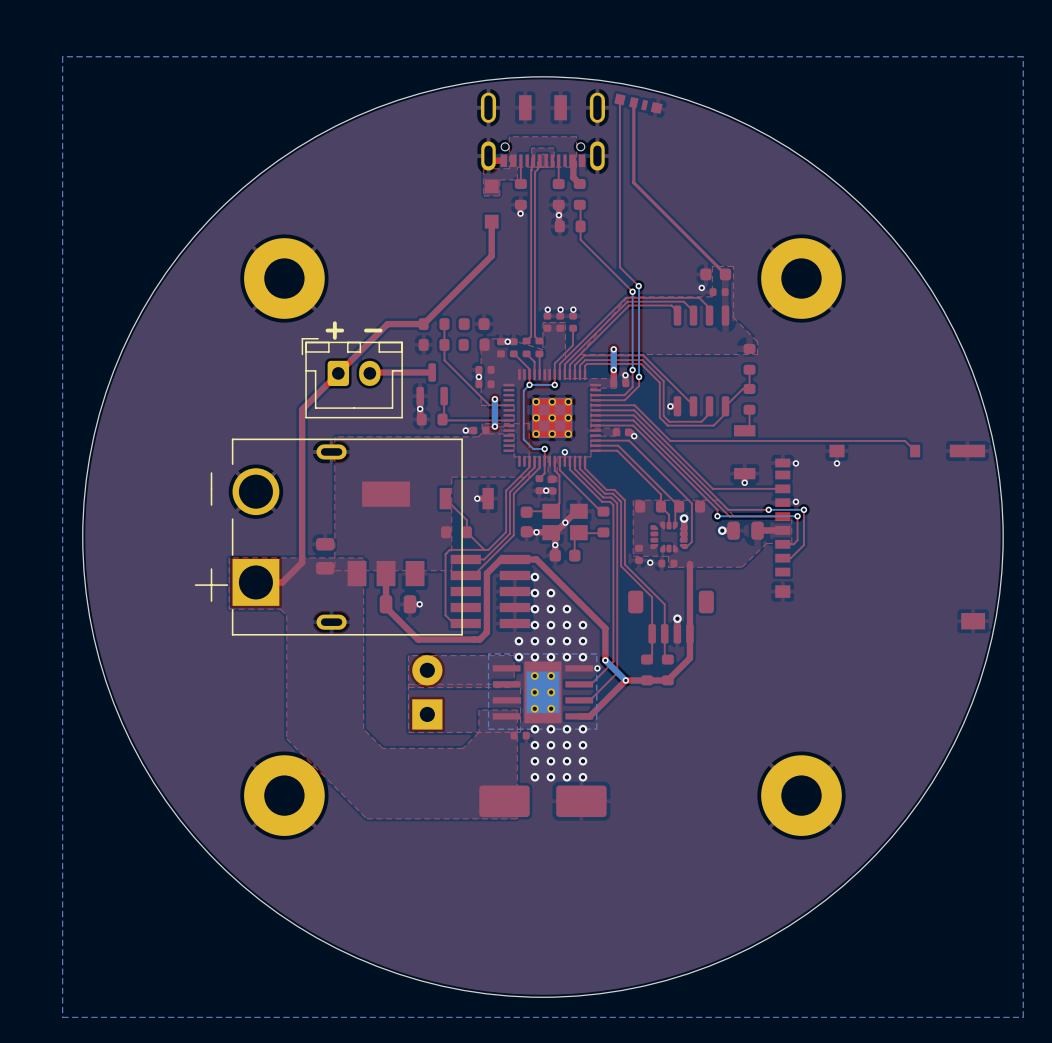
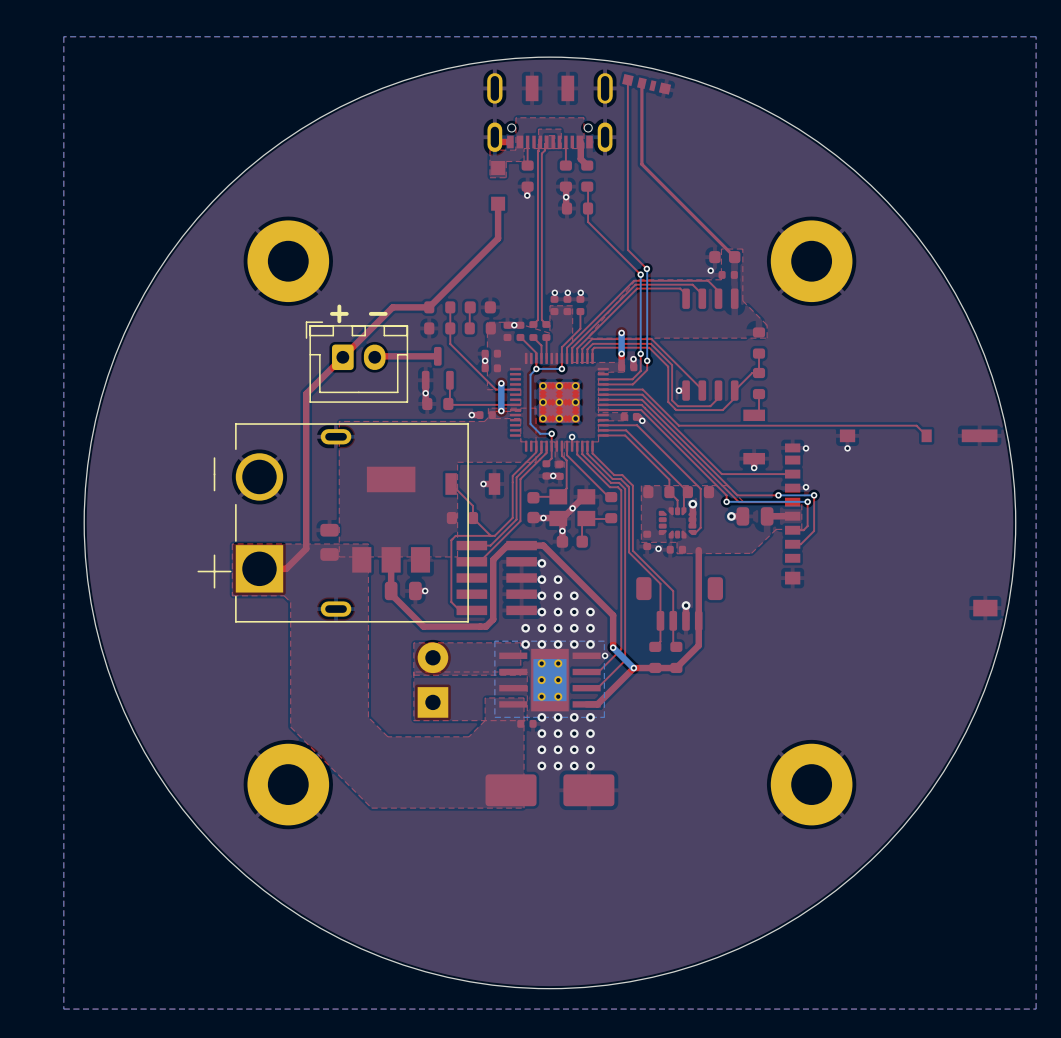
top track: none -> (470, 307) (469, 328)

